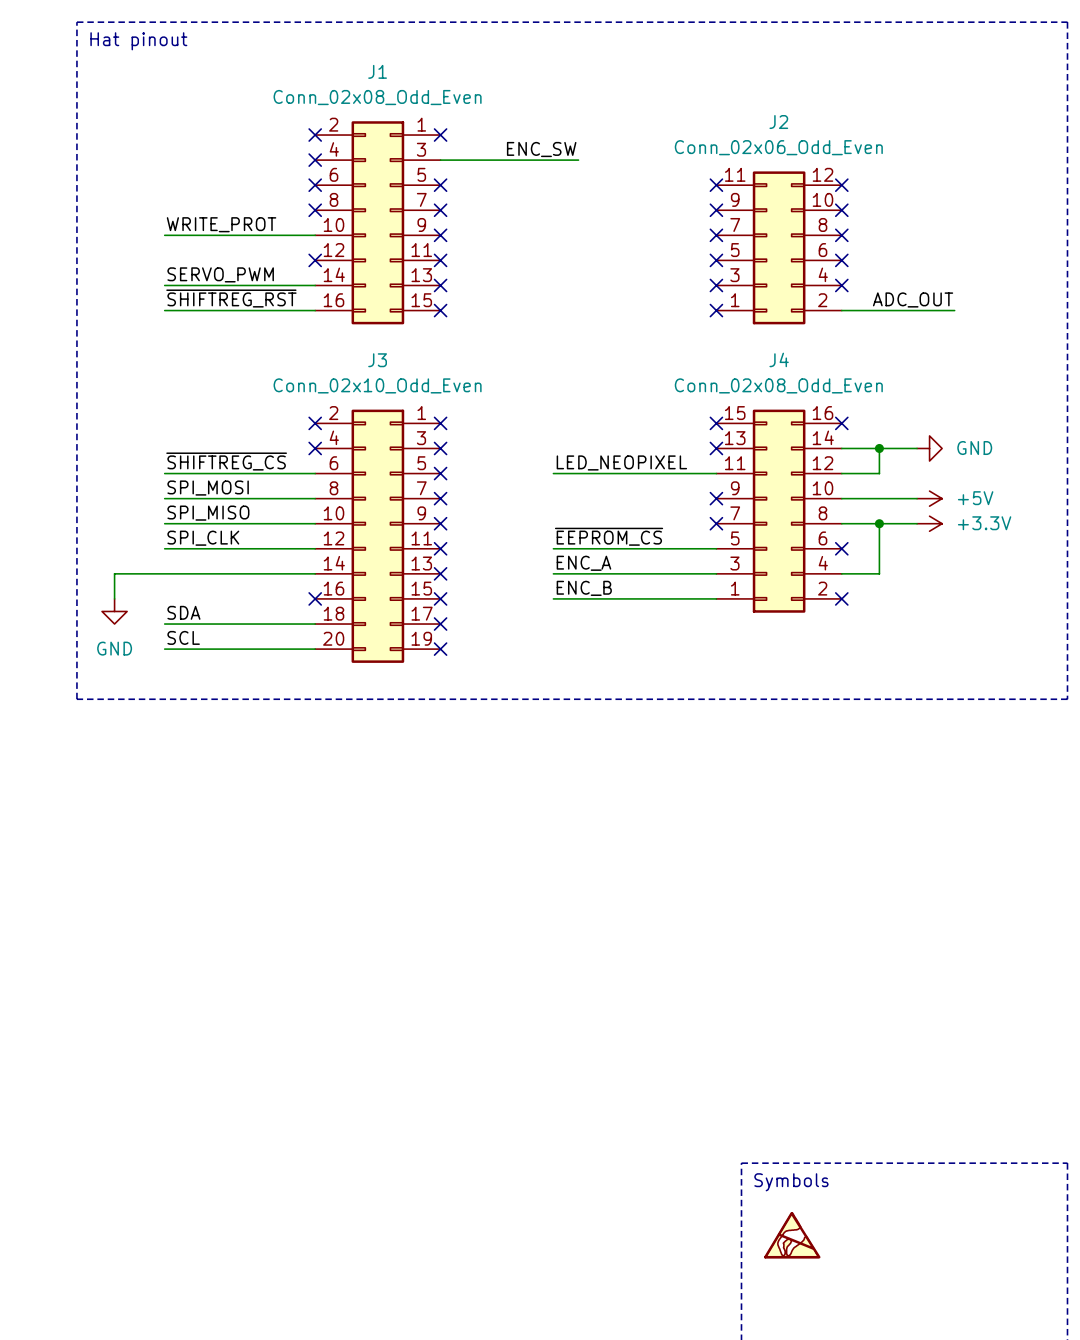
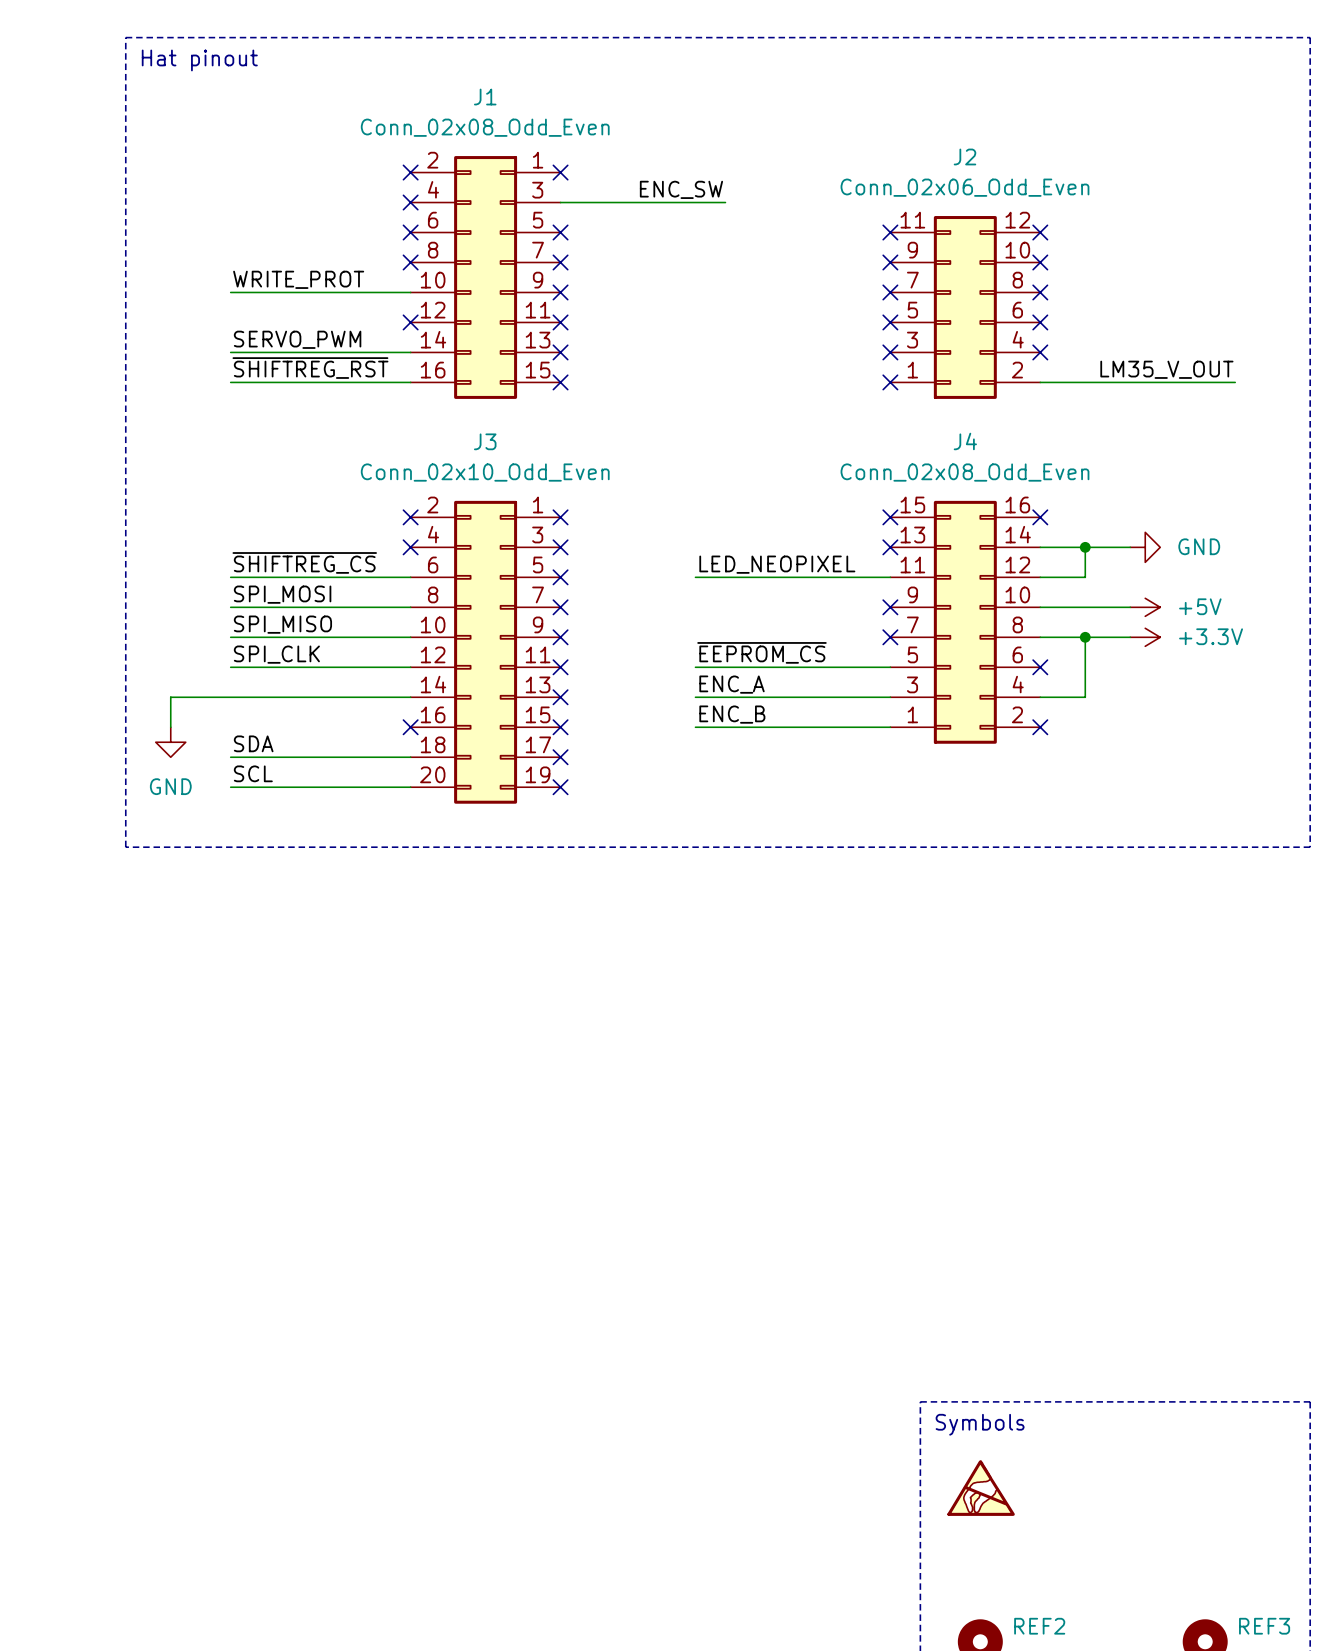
label: ADC_OUT (913, 299) -> none
label: none -> LM35_V_OUT (1166, 369)
wire: none -> (1175, 382) (1235, 382)

